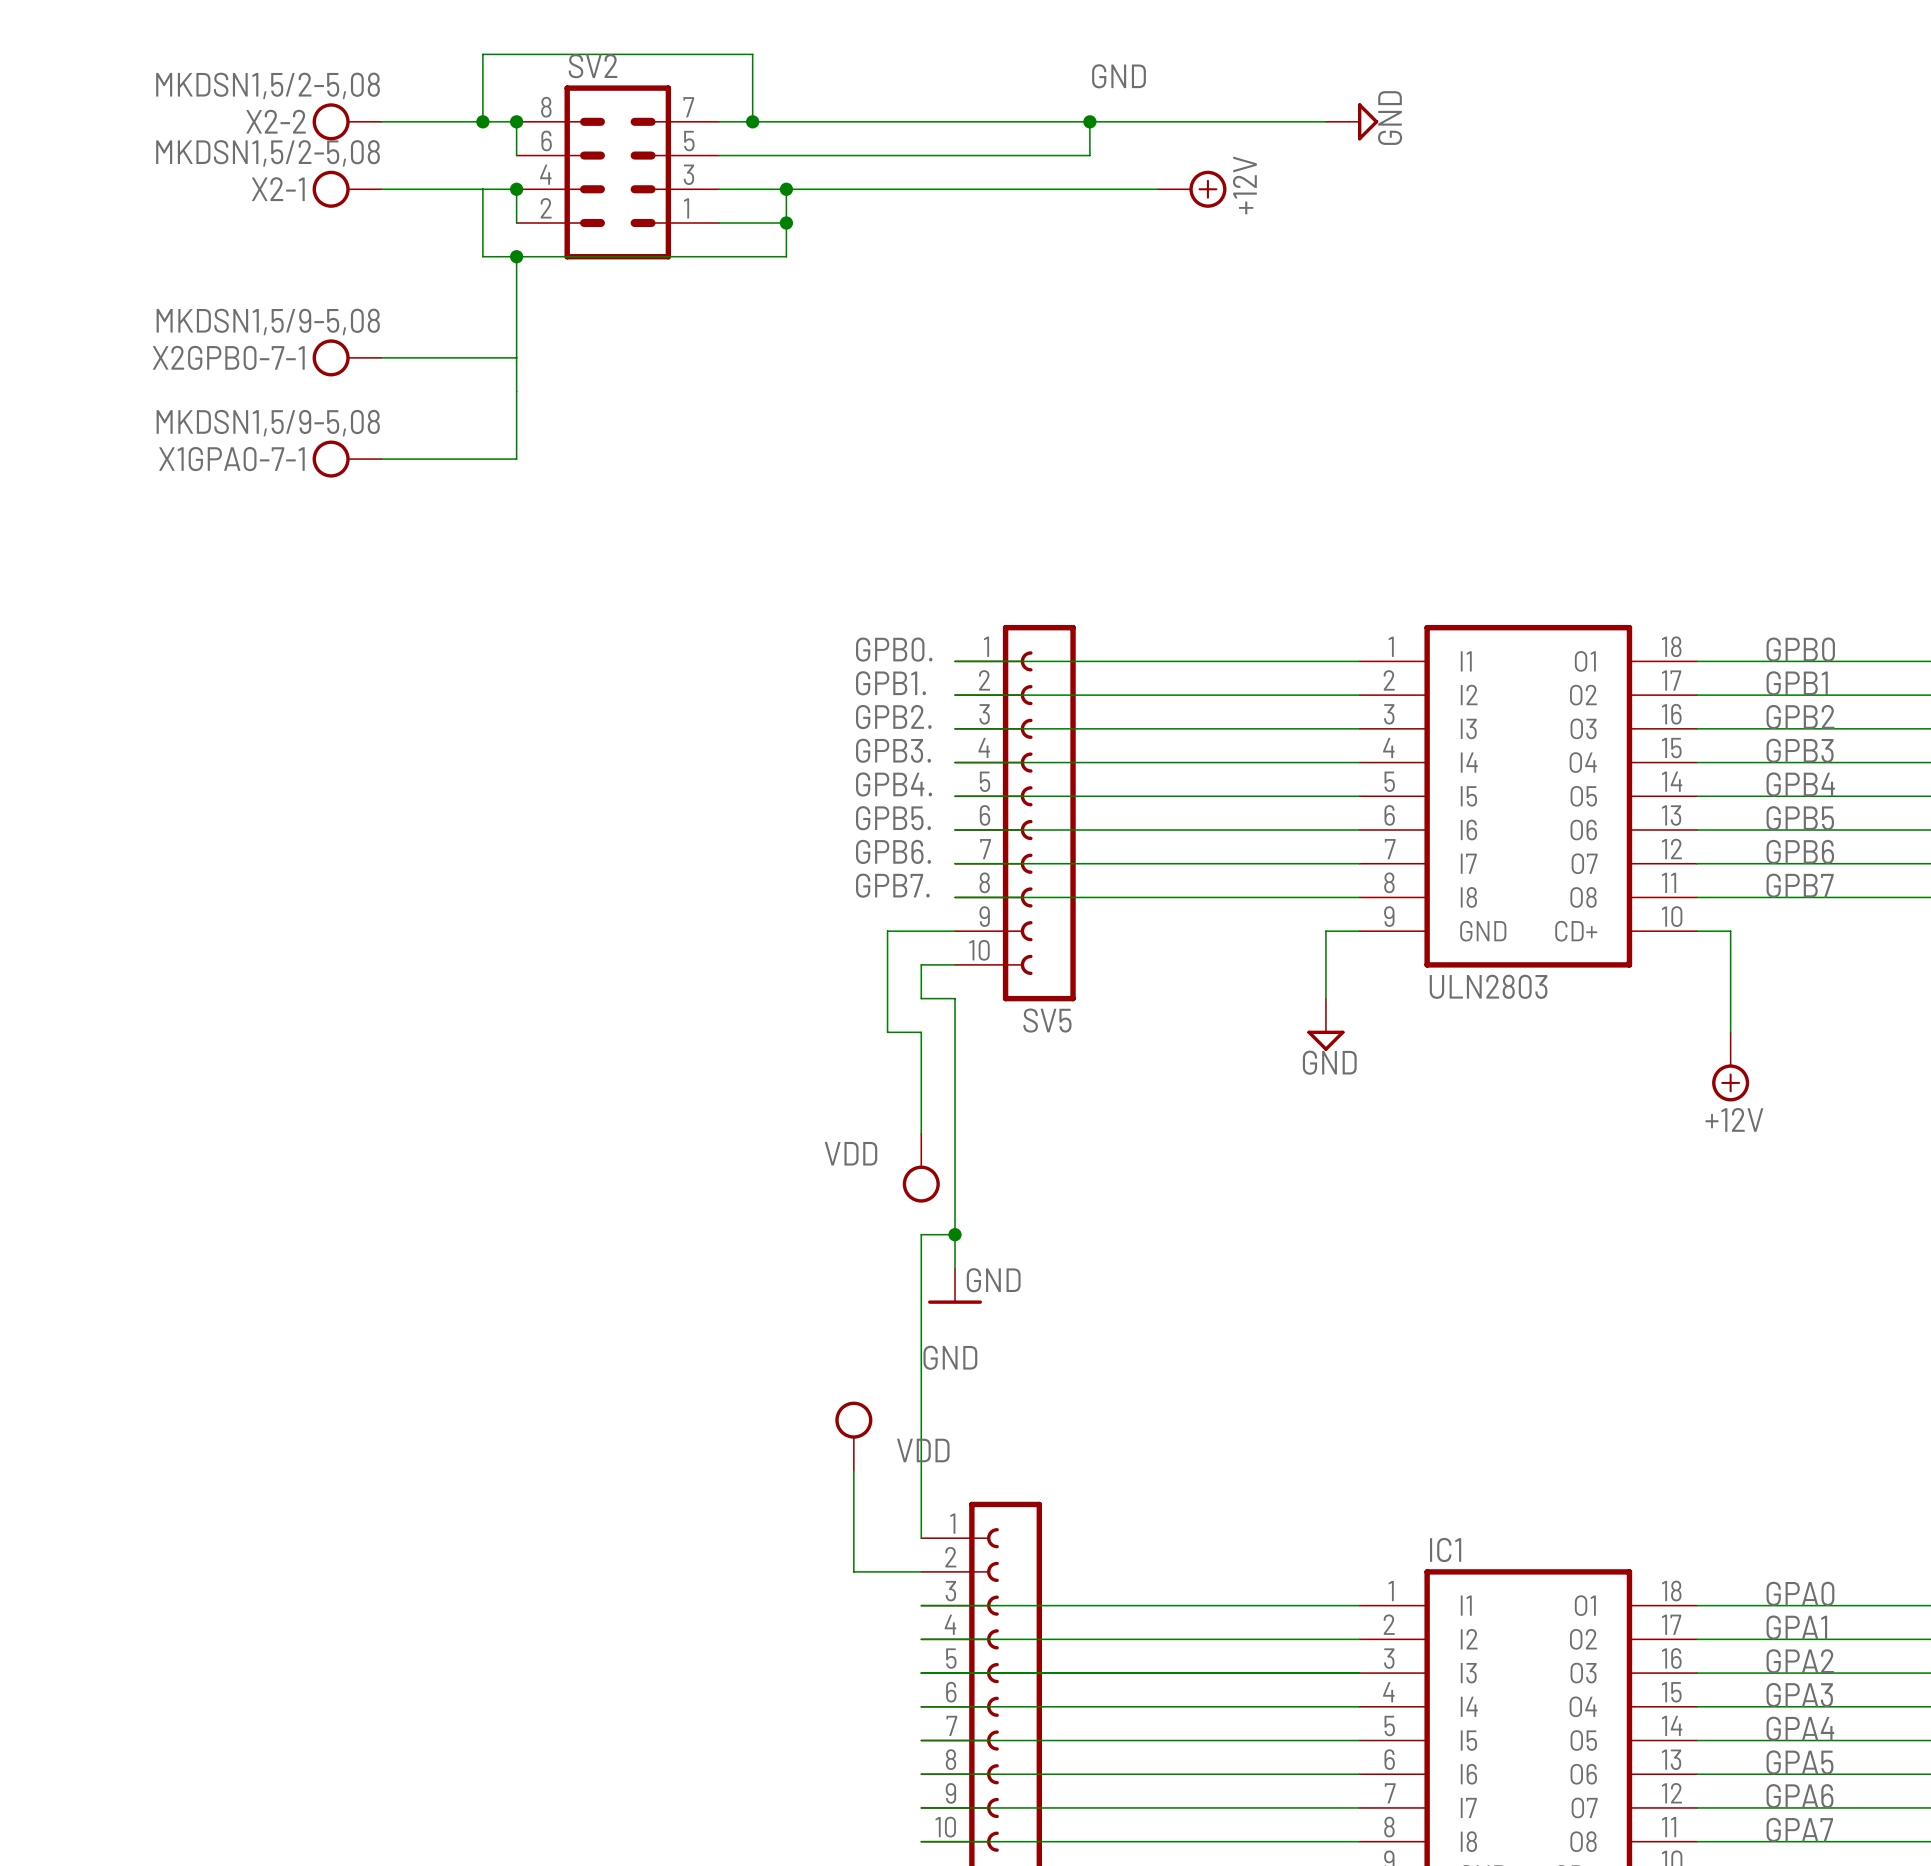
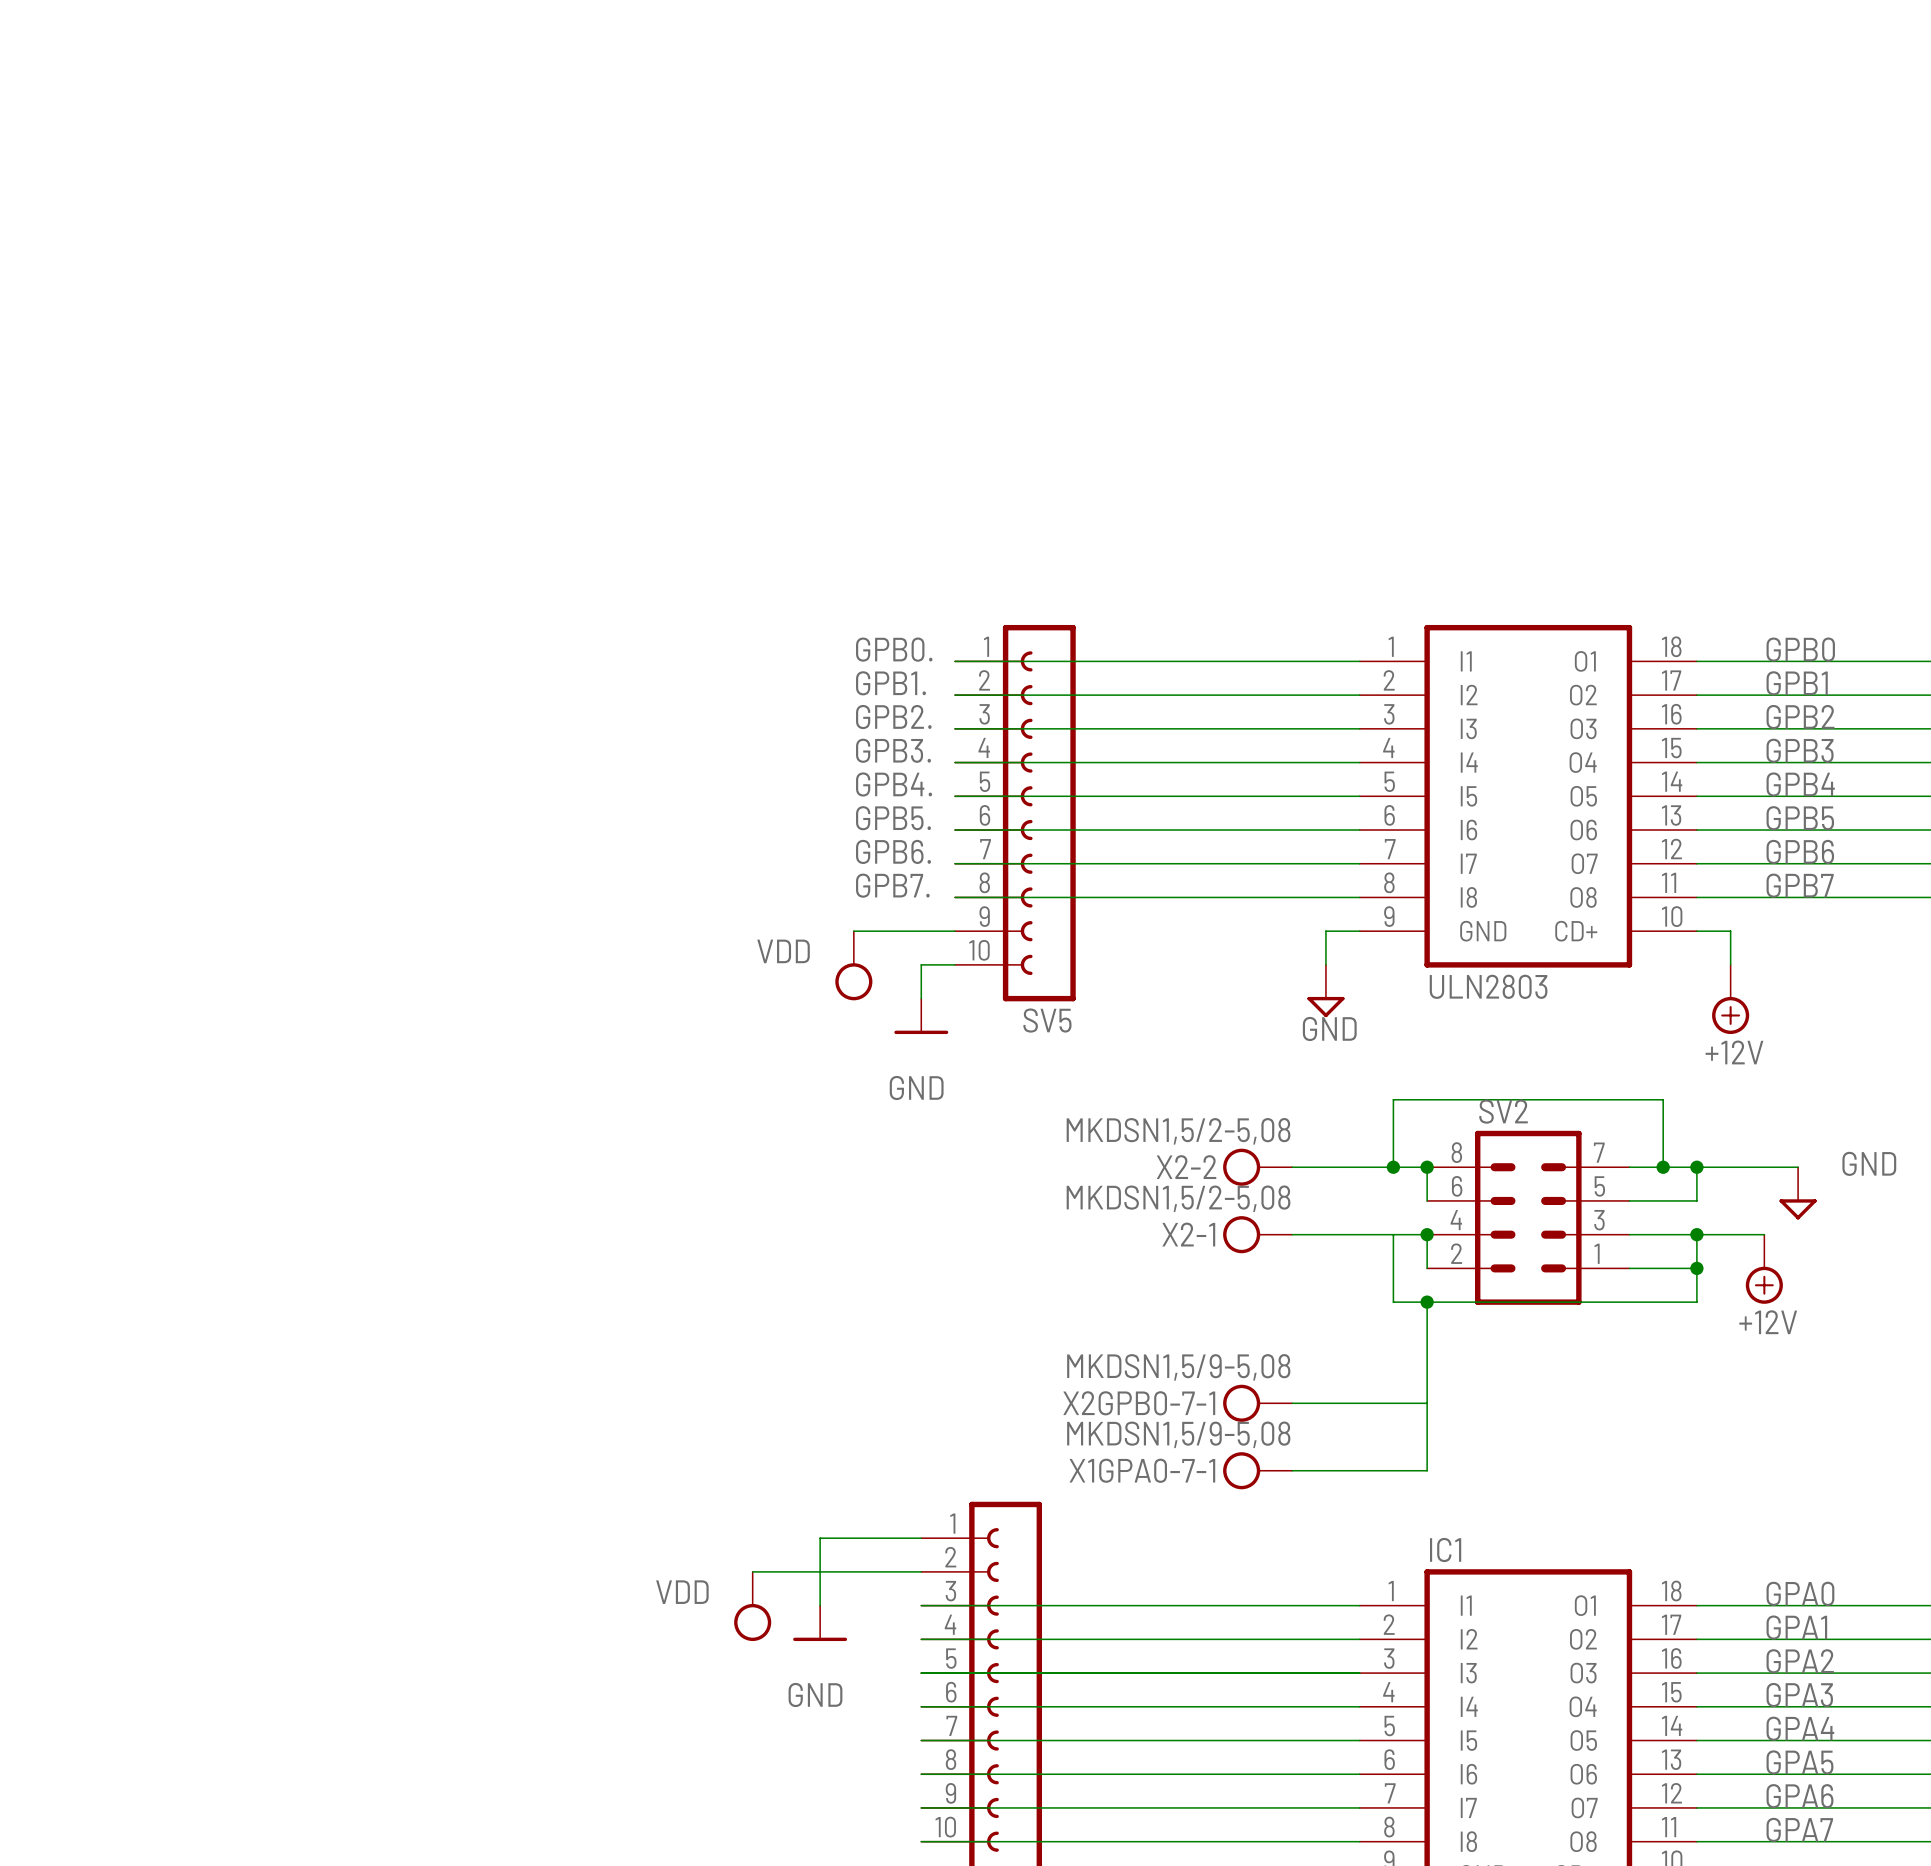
label: GND (1118, 76) -> none
X2-2 position: (347, 121) -> (1257, 1167)
wire: (381, 121) (516, 121) (516, 155) -> none
wire: (482, 121) (482, 54) (752, 54) (752, 121) -> none
junction: (482, 121) -> none
junction: (516, 121) -> none
wire: (718, 121) (1325, 121) -> none
junction: (752, 121) -> none
wire: (1089, 121) (1089, 155) (718, 155) -> none
junction: (1089, 121) -> none
power symbol: GND (1352, 121) -> none
SV2 position: (617, 172) -> (1528, 1217)
X2-1 position: (347, 189) -> (1257, 1234)
wire: (381, 189) (516, 189) (516, 223) -> none
wire: (482, 189) (482, 256) (786, 256) (786, 189) -> none
junction: (516, 189) -> none
wire: (718, 189) (1157, 189) -> none
junction: (786, 189) -> none
power symbol: +12V (1191, 189) -> none
wire: (718, 223) (786, 223) -> none
junction: (786, 223) -> none
wire: (516, 256) (516, 459) (381, 459) -> none
junction: (516, 256) -> none
X2GPB0-7-1 position: (347, 357) -> (1257, 1403)
wire: (381, 357) (516, 357) -> none
X1GPA0-7-1 position: (347, 459) -> (1257, 1470)
wire: (887, 931) (887, 1032) (921, 1032) (921, 1133) -> (887, 931) (853, 931)
wire: (921, 998) (955, 998) (955, 1268) -> none
power symbol: none -> GND (921, 1016)
power symbol position: GND (1325, 1024) -> GND (1325, 991)
power symbol position: +12V (1730, 1066) -> +12V (1730, 999)
wire: none -> (1292, 1167) (1427, 1167) (1427, 1200)
wire: none -> (1393, 1167) (1393, 1099) (1663, 1099) (1663, 1167)
junction: none -> (1393, 1167)
junction: none -> (1427, 1167)
wire: none -> (1629, 1167) (1798, 1167)
junction: none -> (1663, 1167)
wire: none -> (1696, 1167) (1696, 1200) (1629, 1200)
junction: none -> (1696, 1167)
power symbol position: VDD (921, 1168) -> VDD (853, 965)
power symbol: none -> GND (1798, 1193)
wire: (955, 1234) (921, 1234) (921, 1538) -> (820, 1605) (820, 1538) (921, 1538)
junction: (955, 1234) -> none
wire: none -> (1292, 1234) (1427, 1234) (1427, 1268)
wire: none -> (1393, 1234) (1393, 1302) (1696, 1302) (1696, 1234)
junction: none -> (1427, 1234)
wire: none -> (1629, 1234) (1764, 1234)
junction: none -> (1696, 1234)
wire: none -> (1629, 1268) (1696, 1268)
junction: none -> (1696, 1268)
power symbol: none -> +12V (1764, 1269)
label: GND (993, 1280) -> none
power symbol: GND (955, 1286) -> none
wire: none -> (1427, 1302) (1427, 1470) (1292, 1470)
junction: none -> (1427, 1302)
wire: none -> (1292, 1403) (1427, 1403)
power symbol rotation: 0° (853, 1420) -> 180° (752, 1622)
power symbol position: VDD (853, 1436) -> VDD (752, 1606)
wire: (853, 1470) (853, 1571) -> (752, 1571) (853, 1571)
power symbol: none -> GND (820, 1623)

